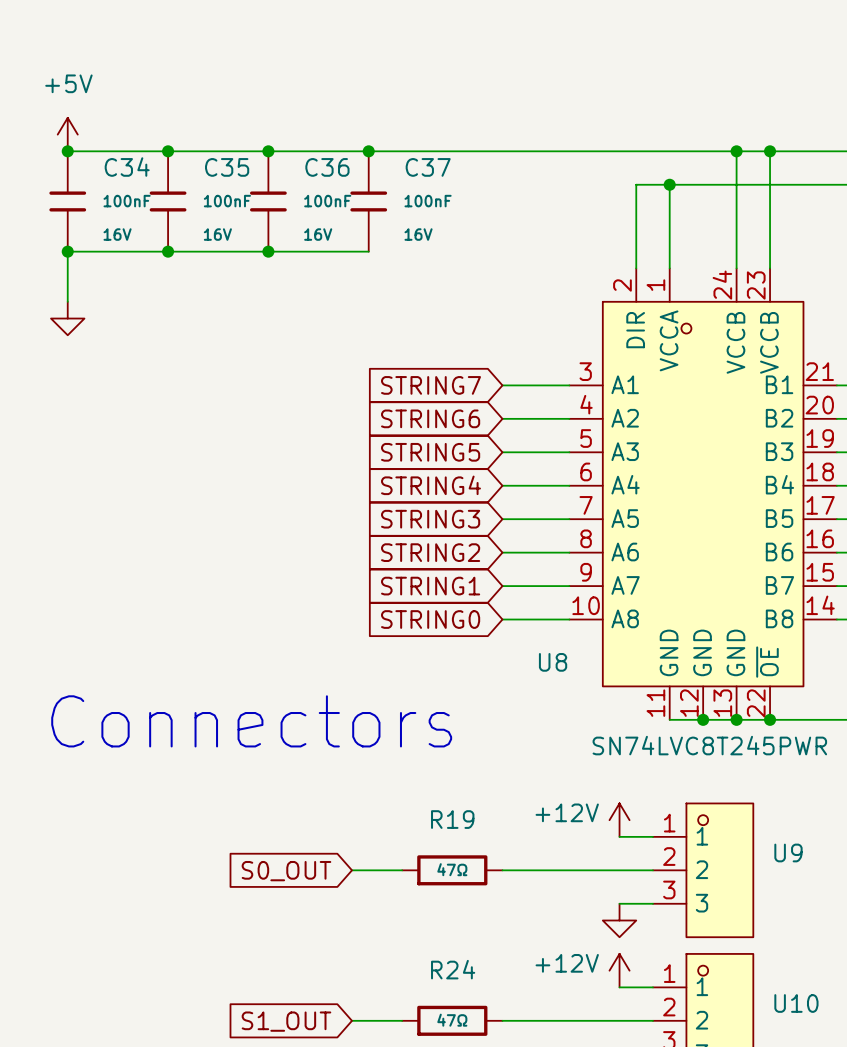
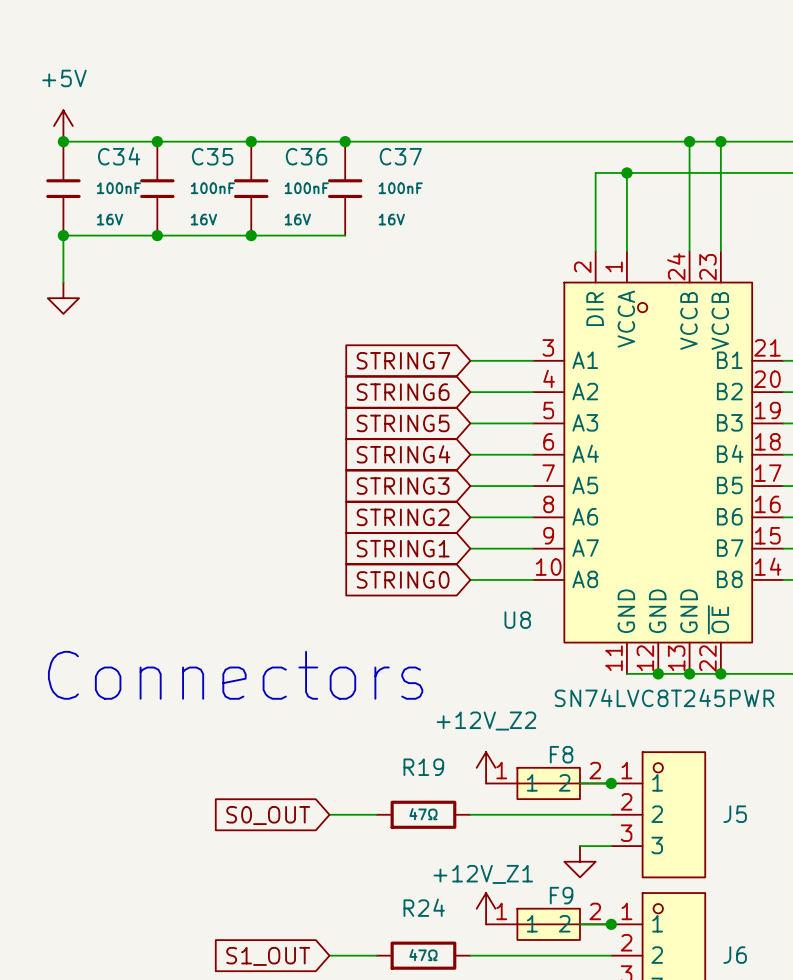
power symbol: none -> +12V_Z2 (486, 767)
power symbol: +12V (619, 820) -> none
F8: none -> (548, 783)
junction: none -> (611, 783)
U9 name: U9 (788, 852) -> J5 (735, 814)
power symbol: none -> +12V_Z1 (486, 908)
power symbol: +12V (619, 970) -> none
F9: none -> (548, 924)
junction: none -> (611, 924)
U10 name: U10 (796, 1003) -> J6 (735, 955)

